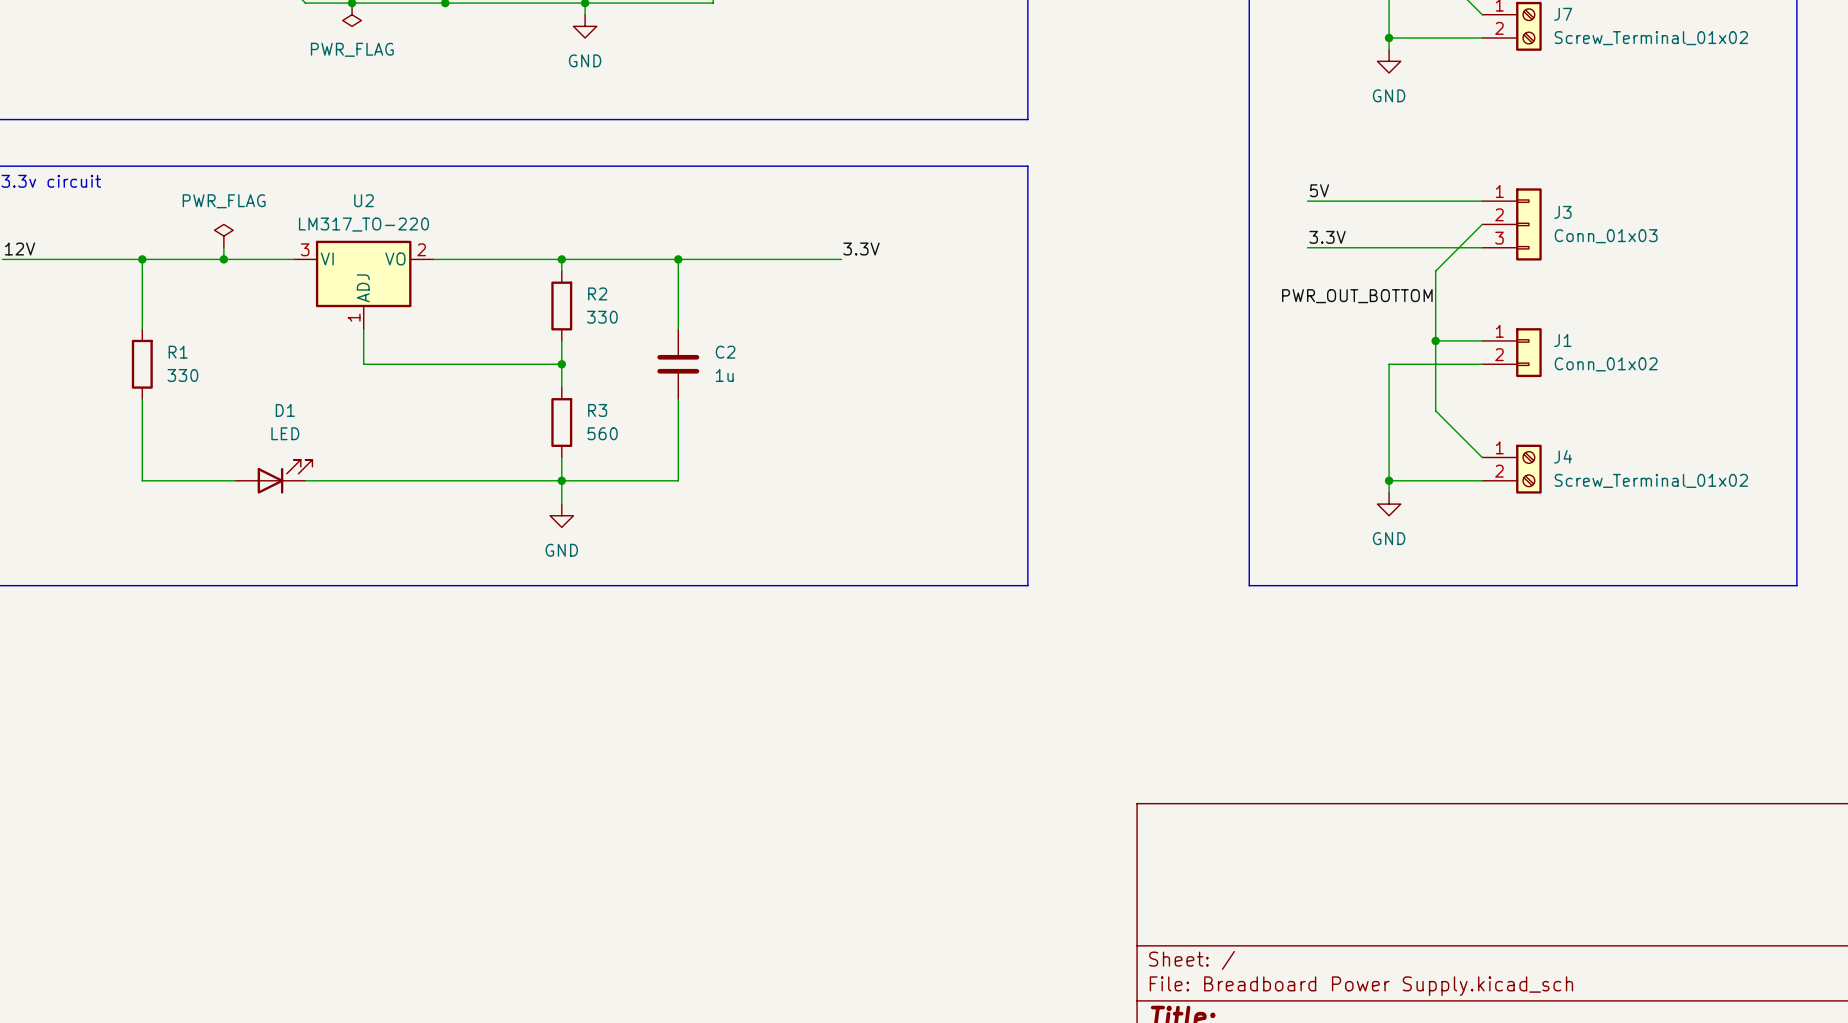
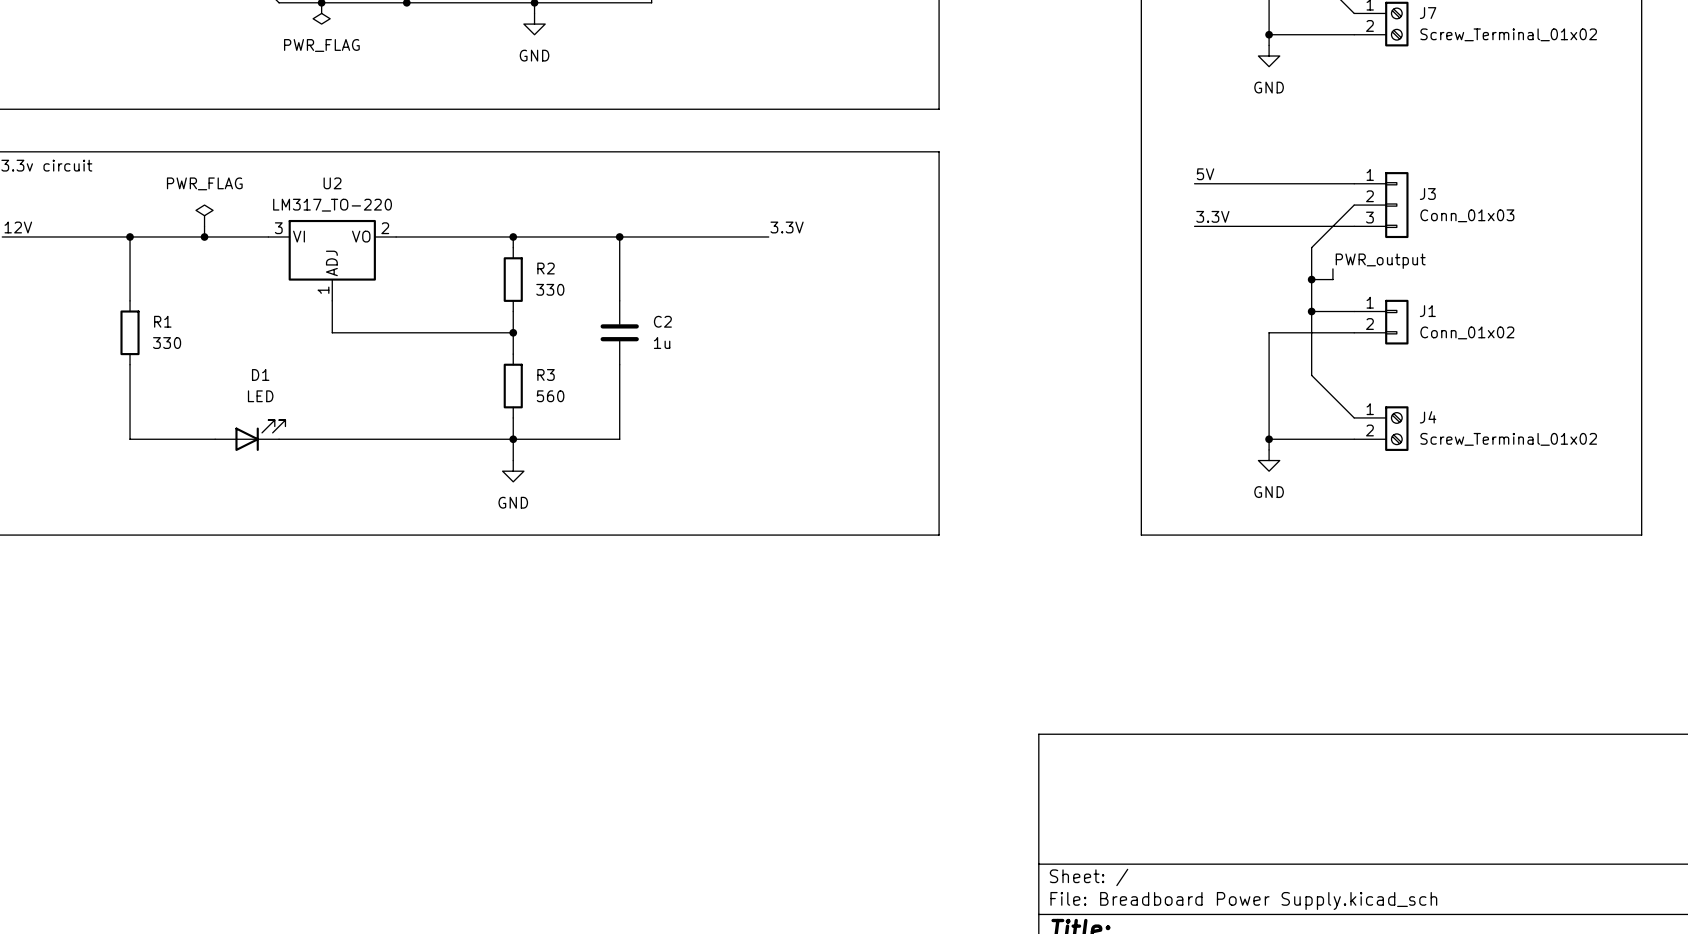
label: none -> PWR_output (1380, 261)
wire: none -> (1332, 268) (1332, 279) (1311, 279)
label: PWR_OUT_BOTTOM (1357, 296) -> none
junction: none -> (1311, 279)

